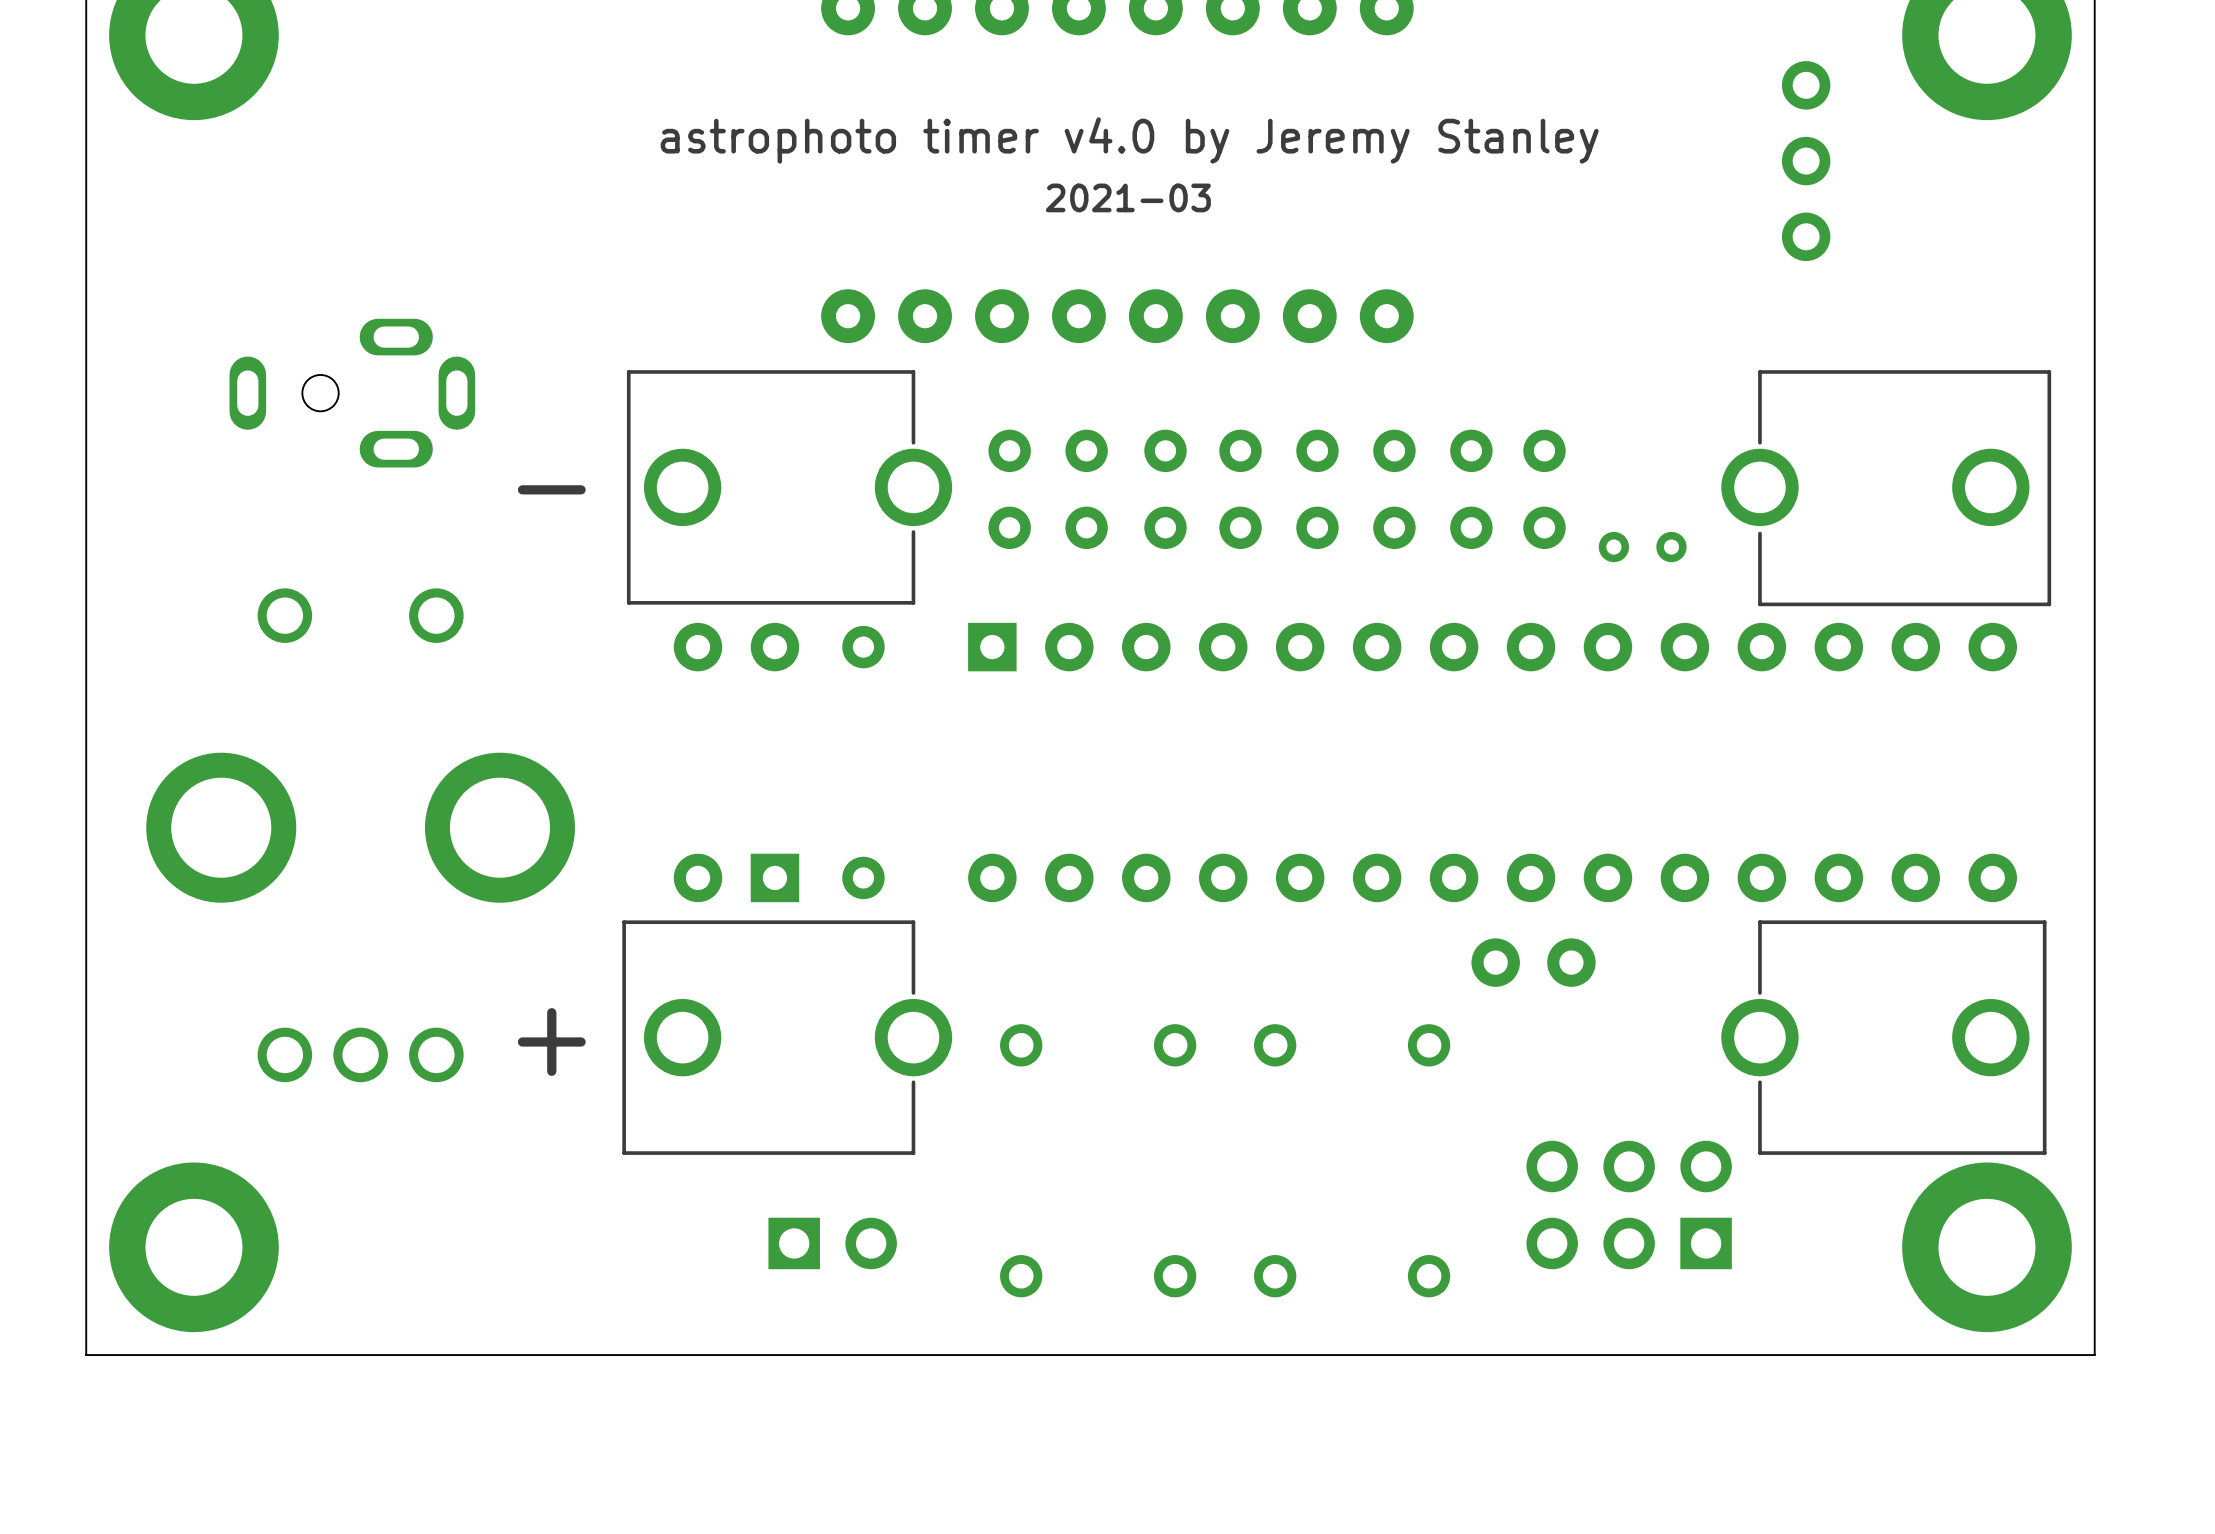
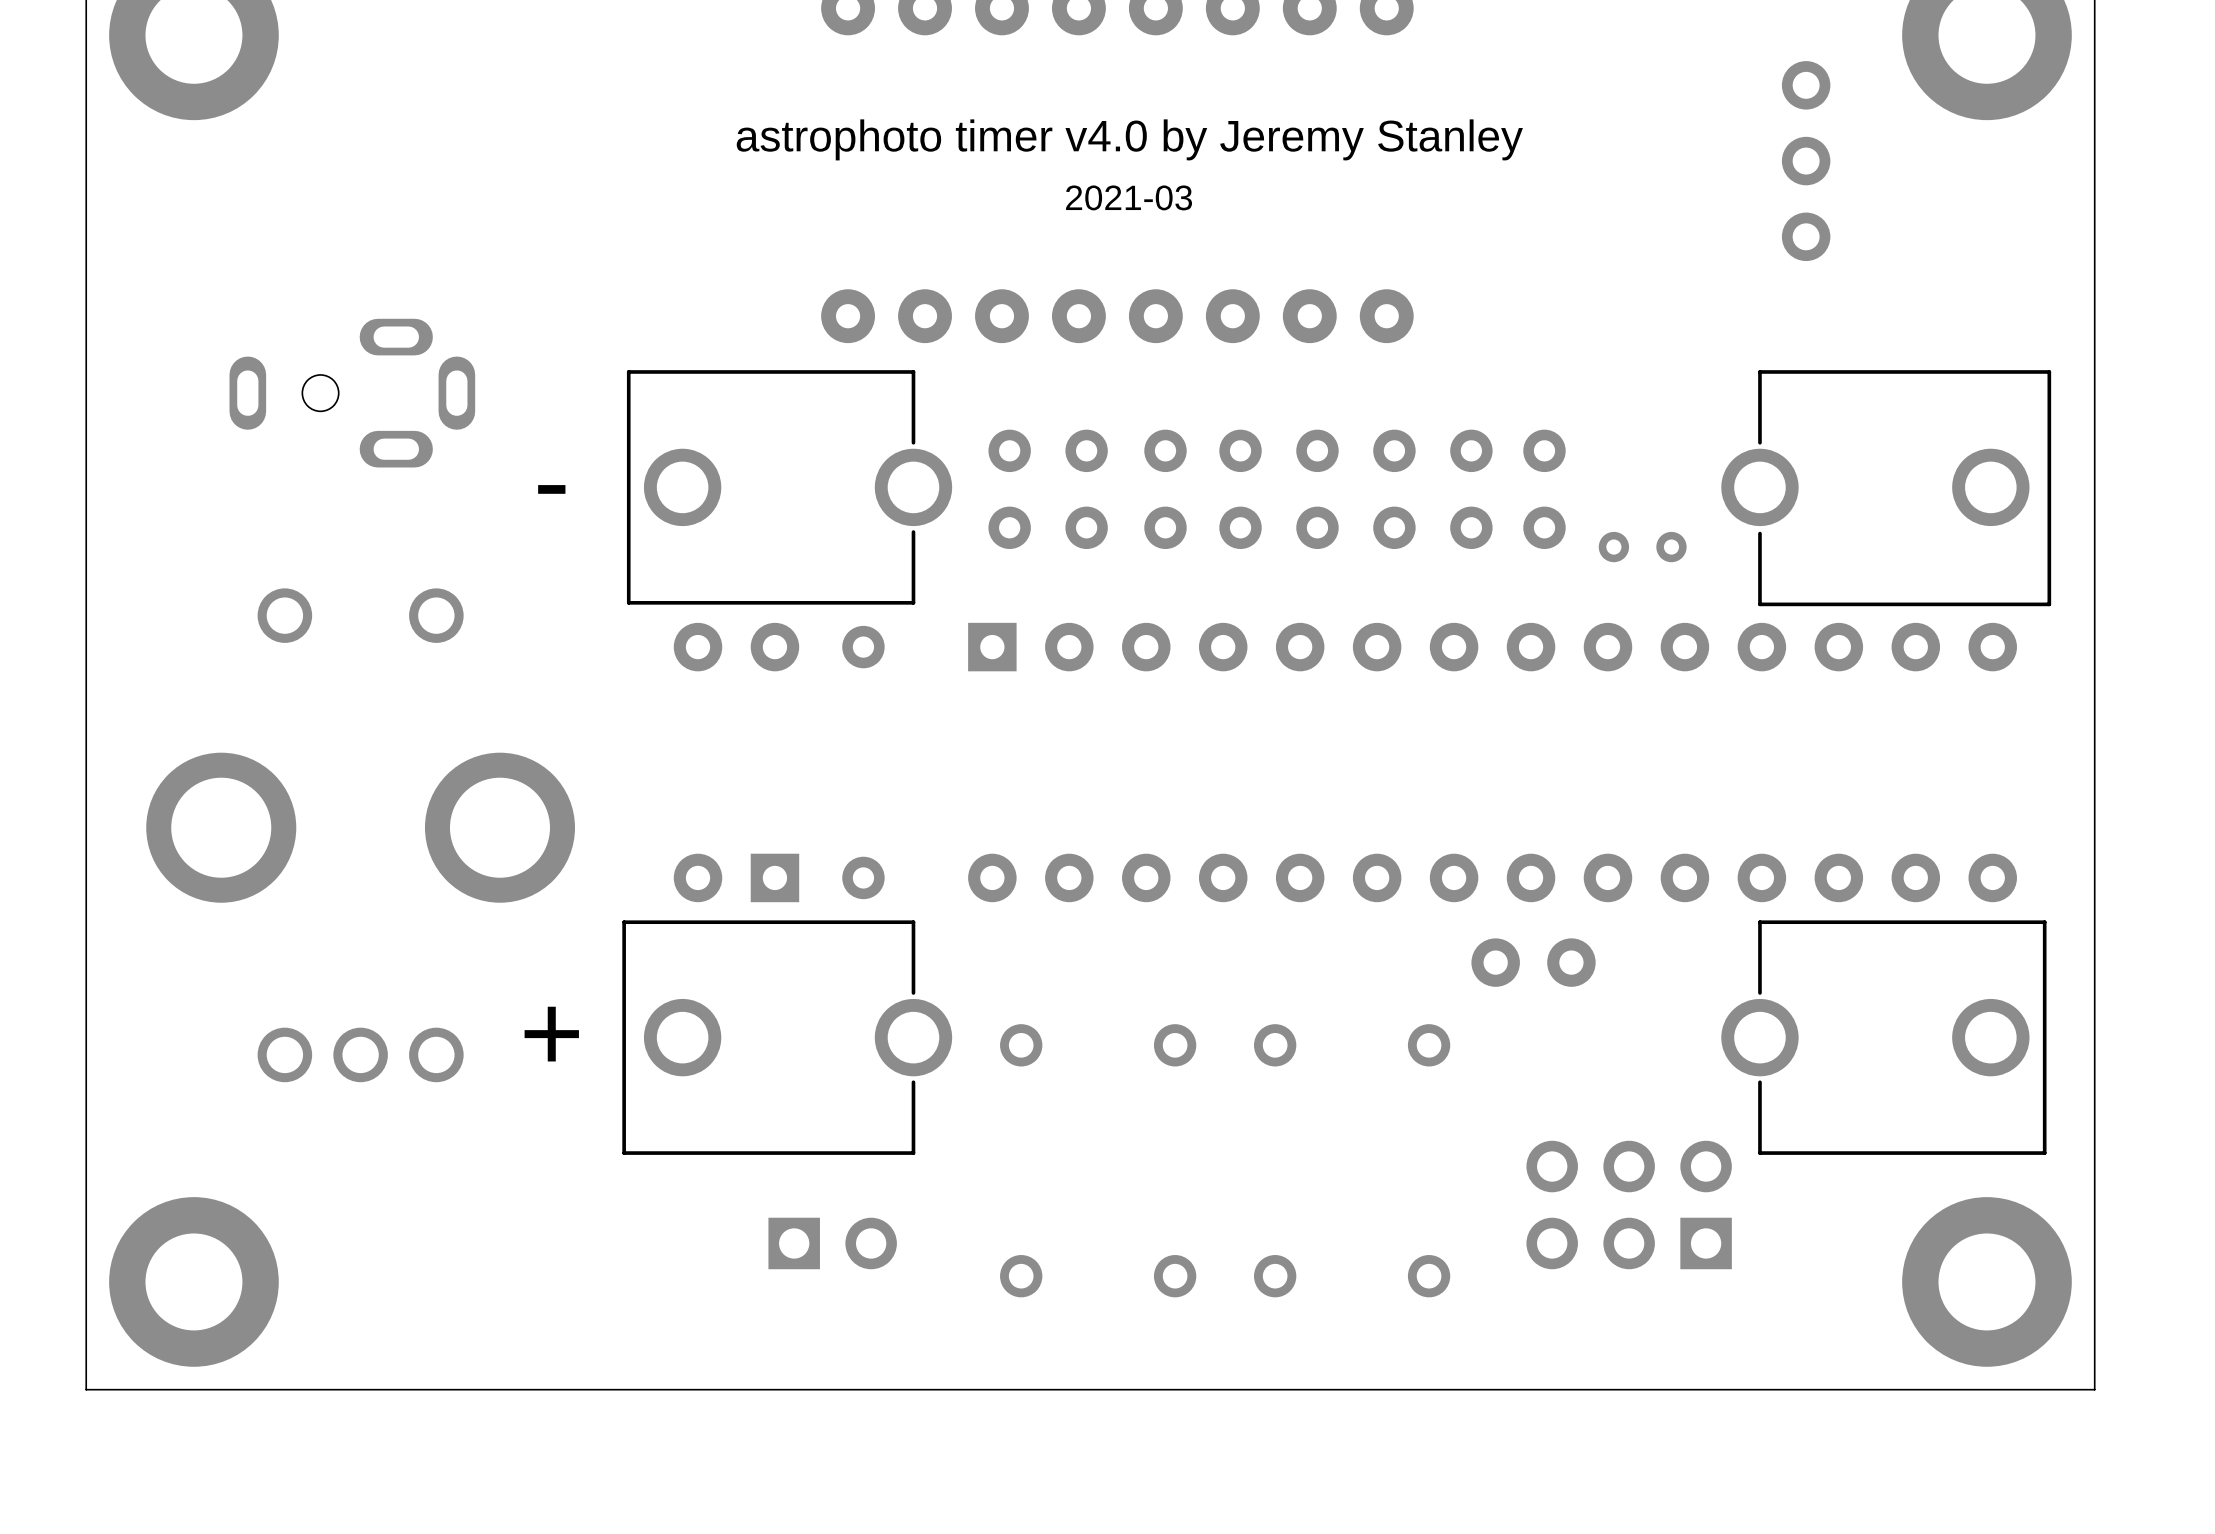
part position: (193, 1247) -> (193, 1281)
part position: (1986, 1247) -> (1986, 1281)
board edge: (2094, 1355) (86, 1355) -> (2094, 1355) (2094, 1389) (86, 1389) (86, 1355)

